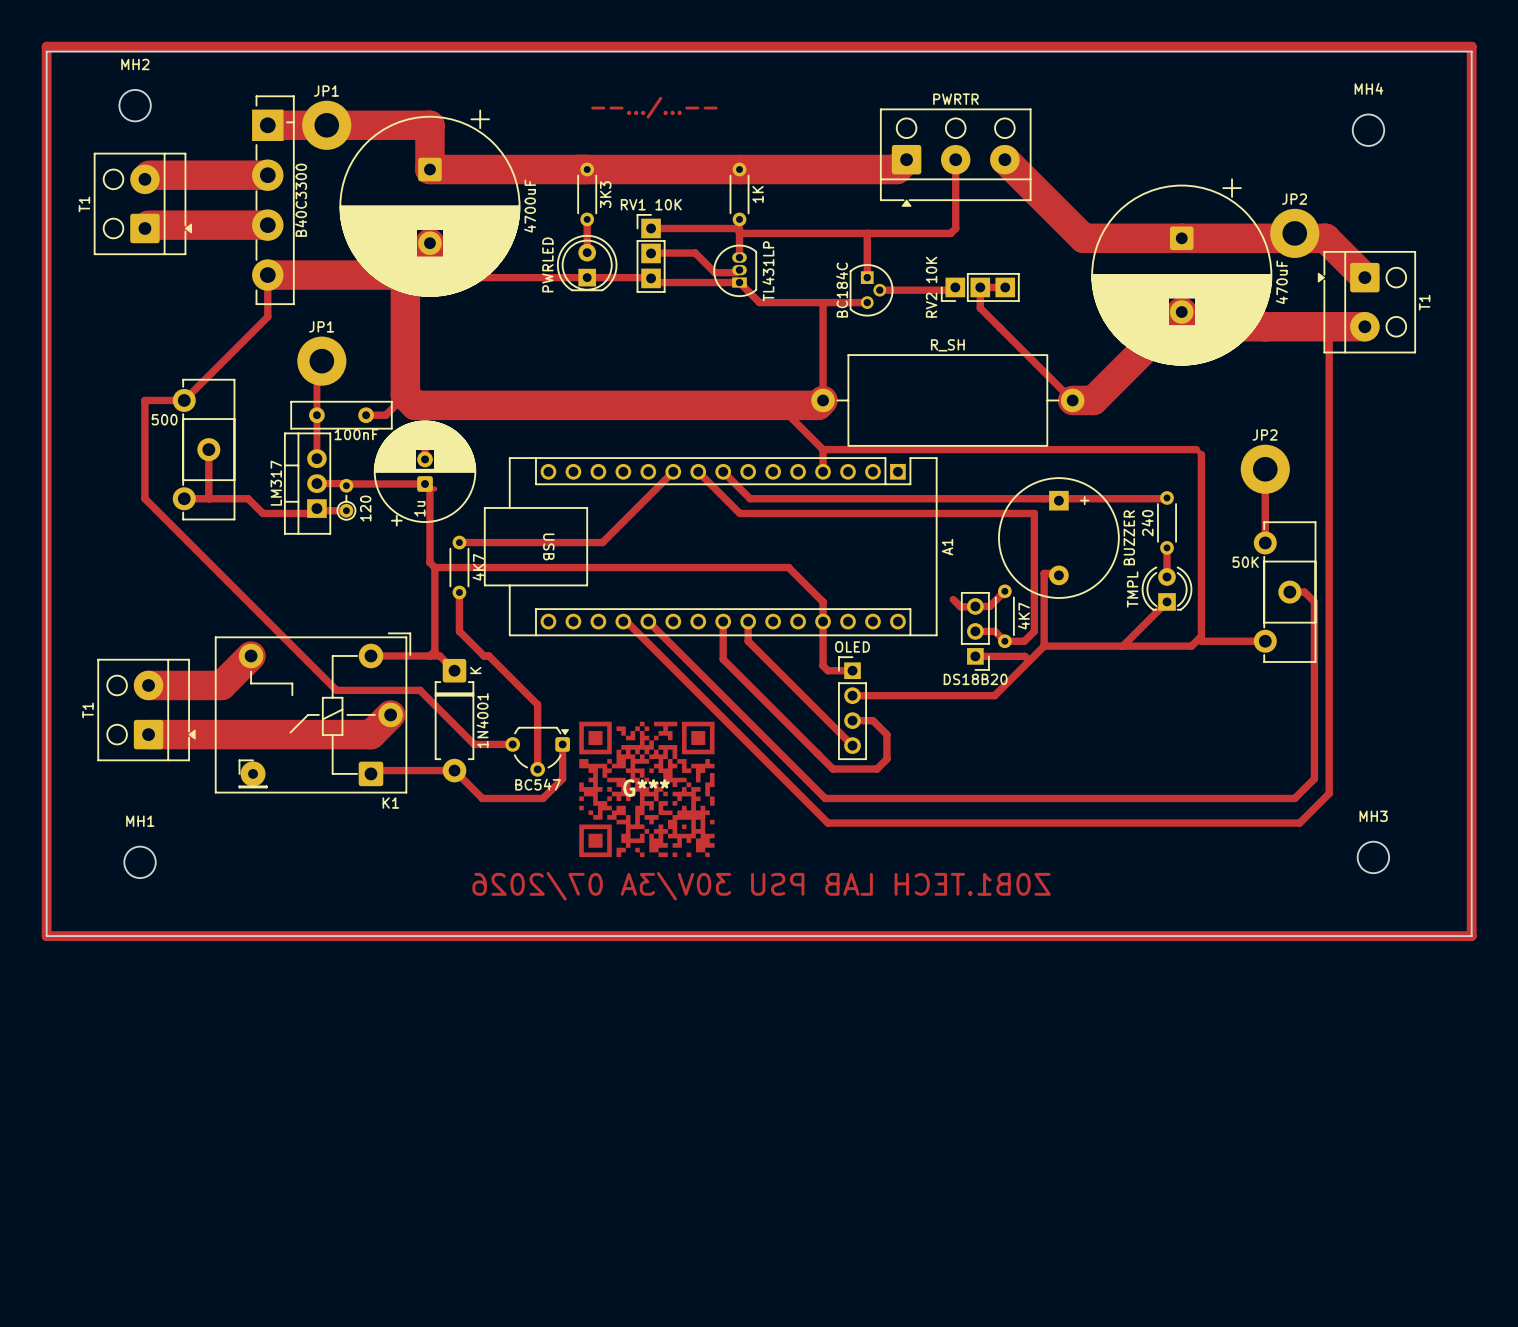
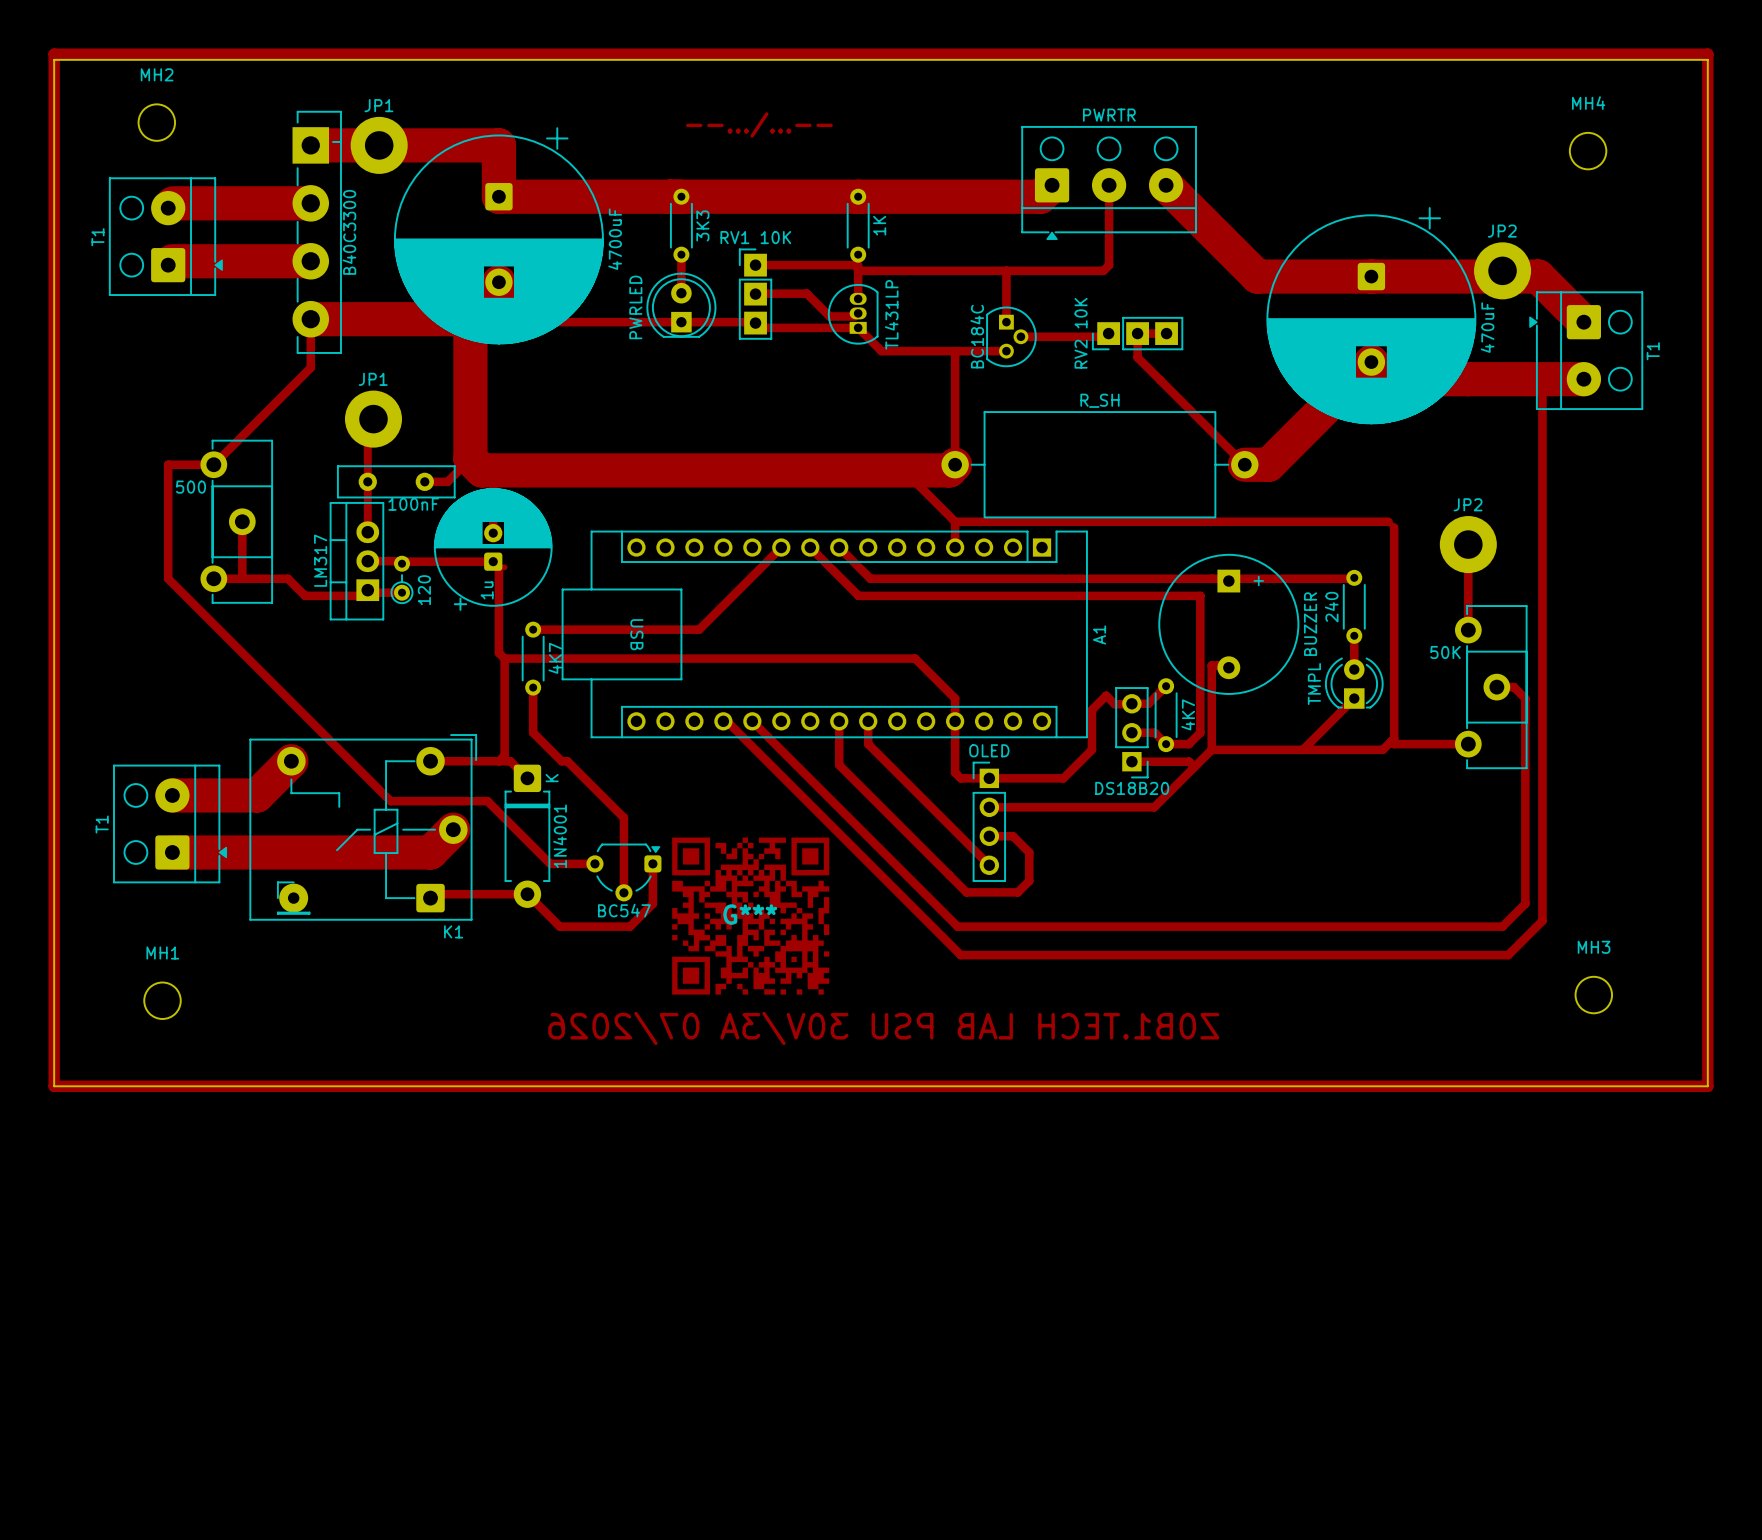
top track: none -> (1106, 695) (1091, 709) (1091, 749) (1063, 778) (989, 778)

